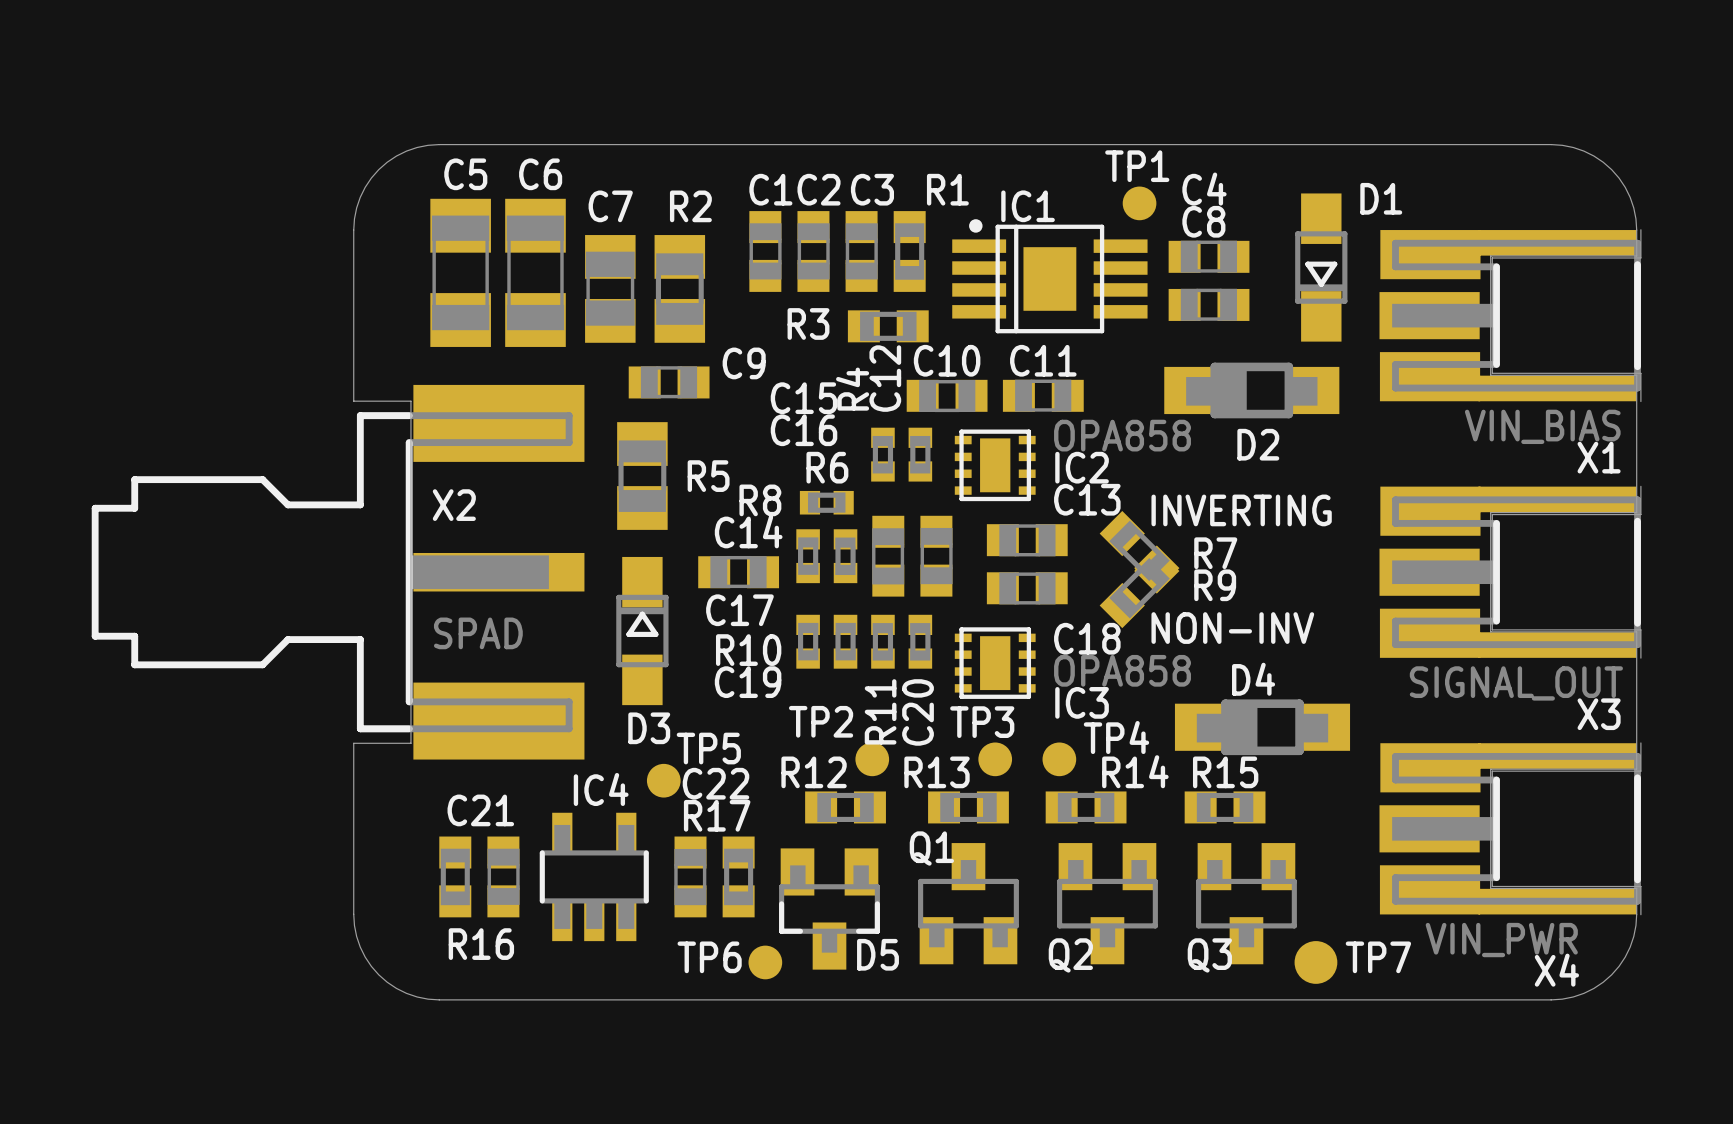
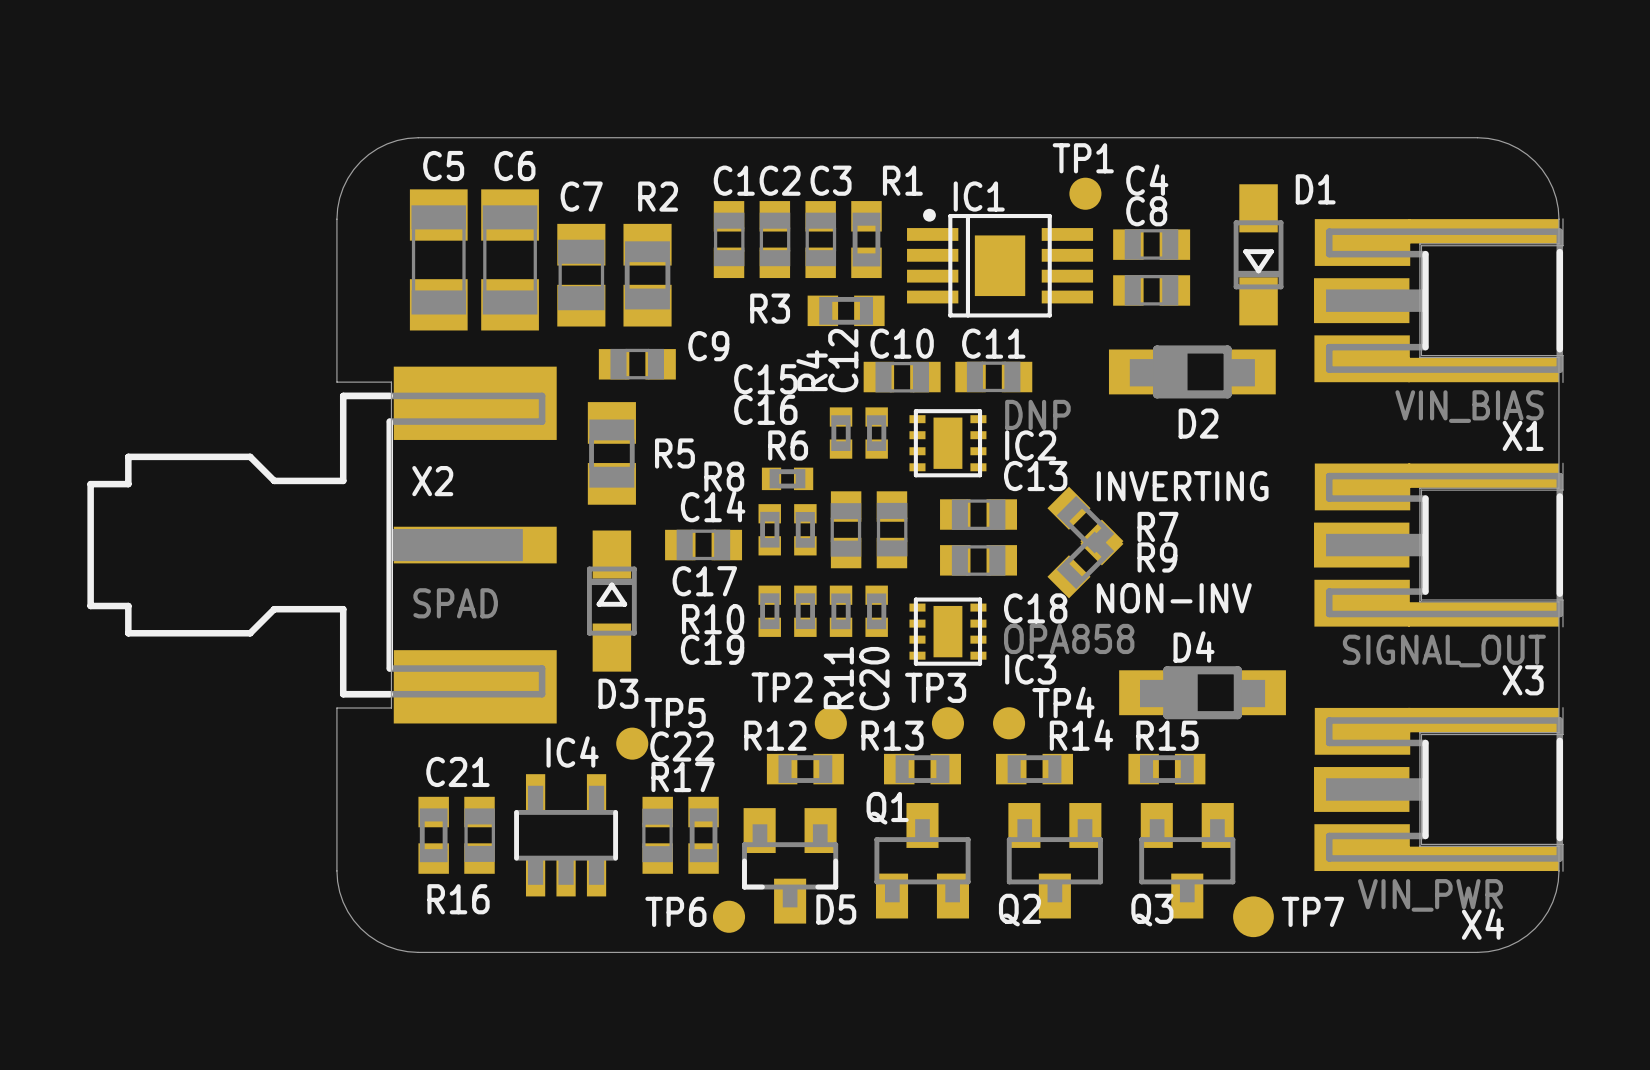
IC2 value: OPA858 (1122, 435) -> DNP (1037, 414)

